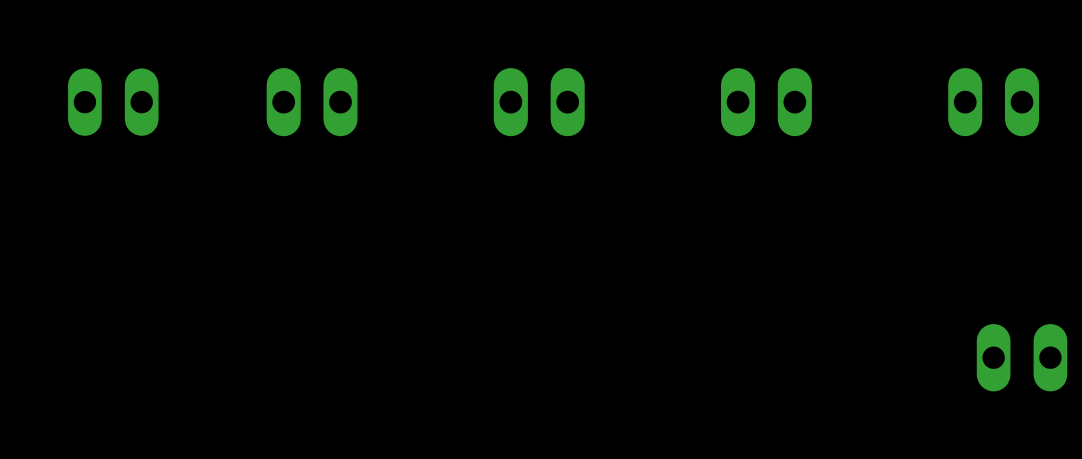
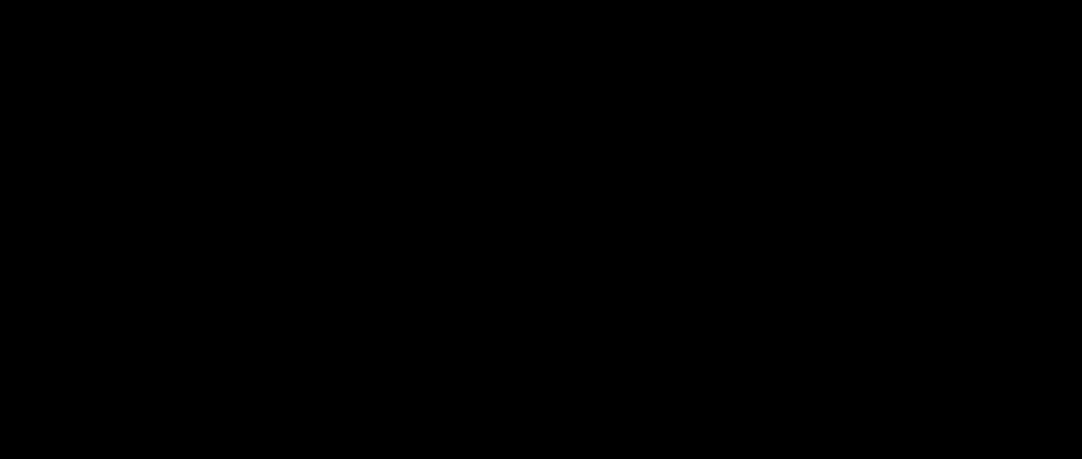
part: (113, 102) -> none
part: (312, 102) -> none
part: (539, 102) -> none
part: (766, 102) -> none
part: (993, 102) -> none
part: (1022, 357) -> none

